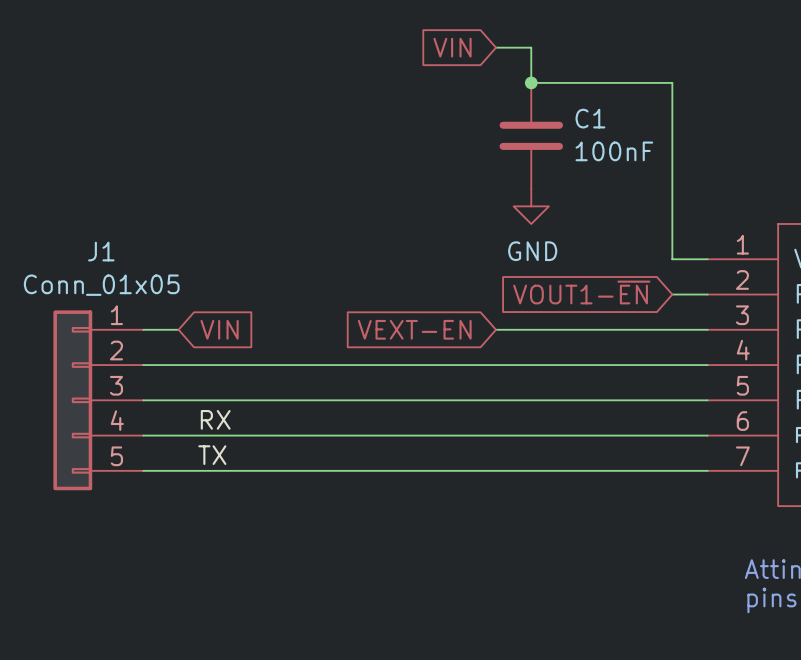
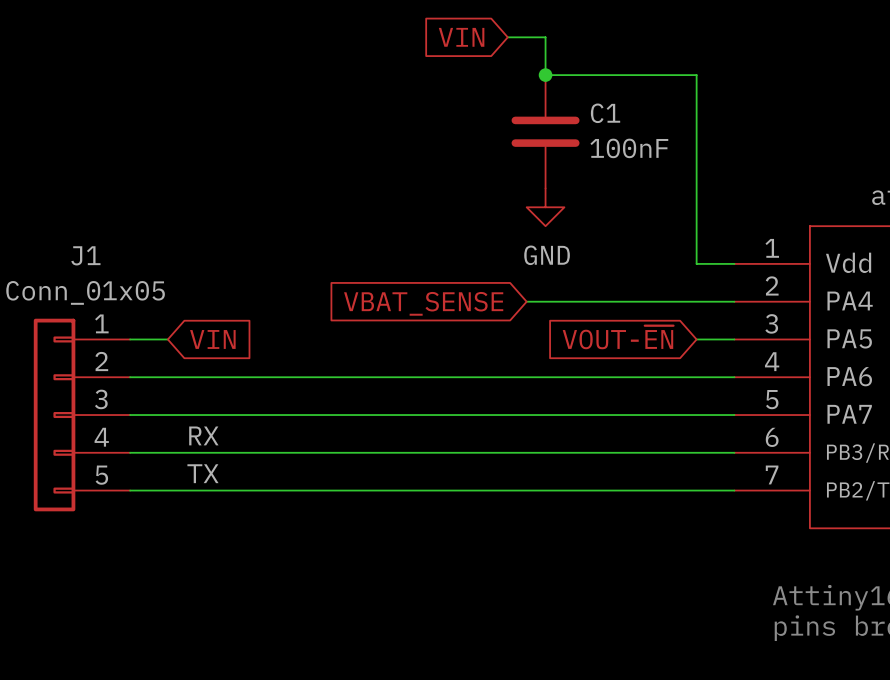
global label: VOUT1-~{EN} (581, 292) -> VOUT-~{EN} (618, 337)
wire: none -> (526, 301) (696, 301)
global label: none -> VBAT_SENSE (423, 303)
global label: VEXT-EN (414, 329) -> none
wire: (496, 329) (672, 329) -> none

